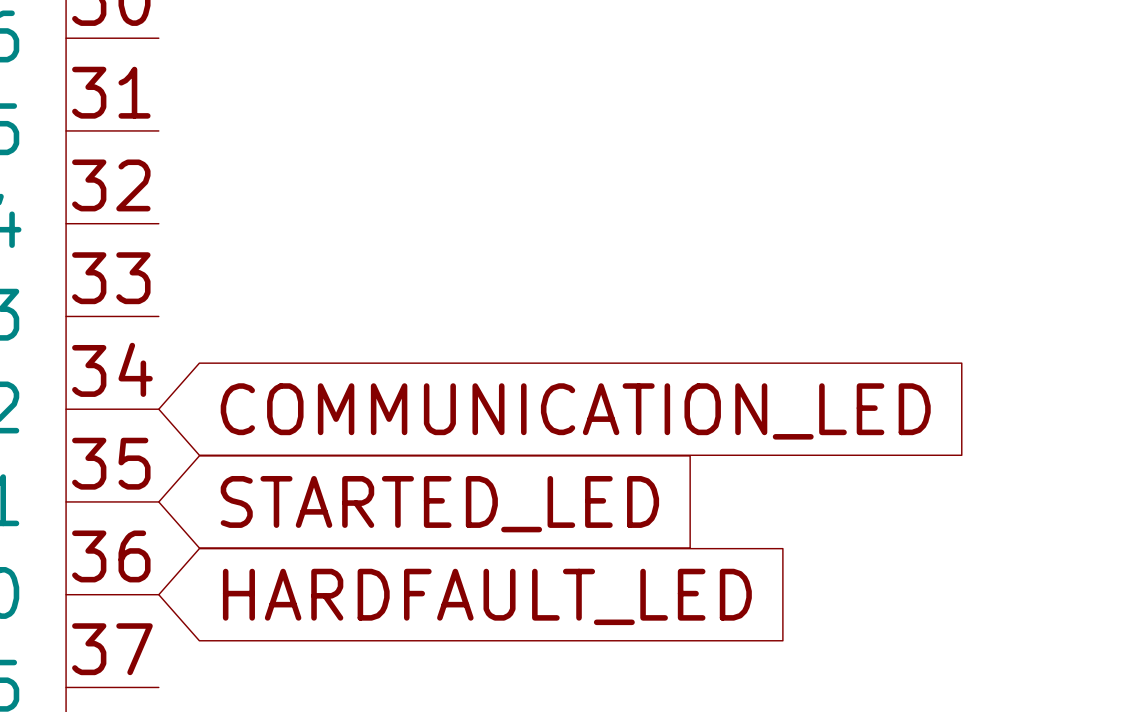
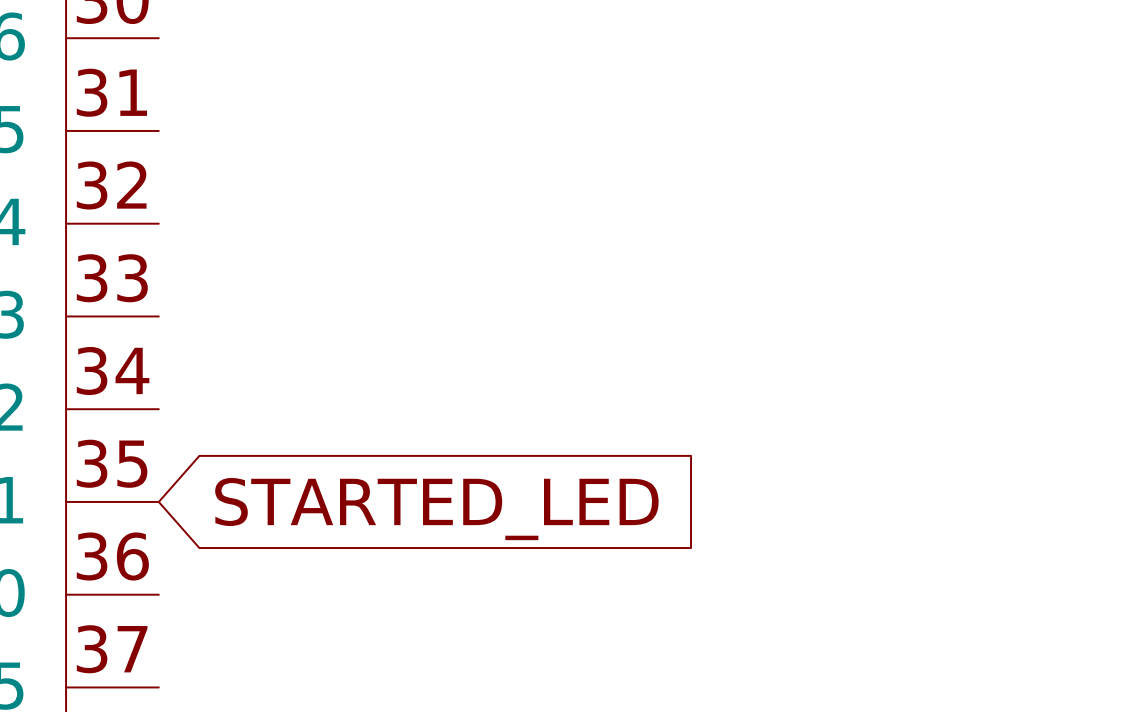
global label: COMMUNICATION_LED (575, 411) -> none
global label: HARDFAULT_LED (487, 596) -> none

